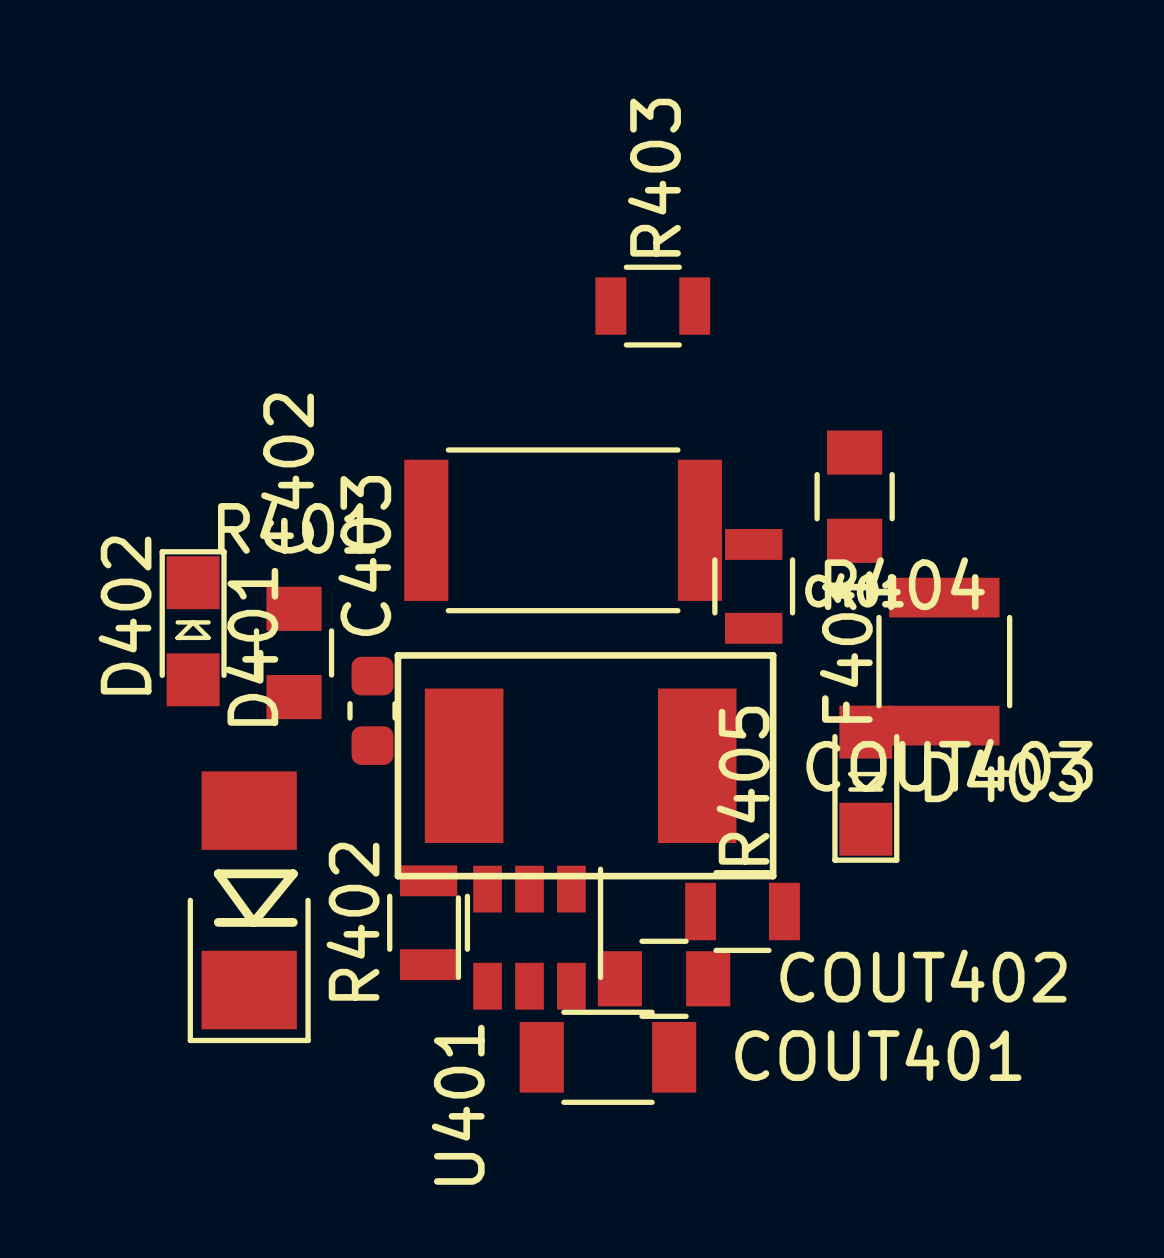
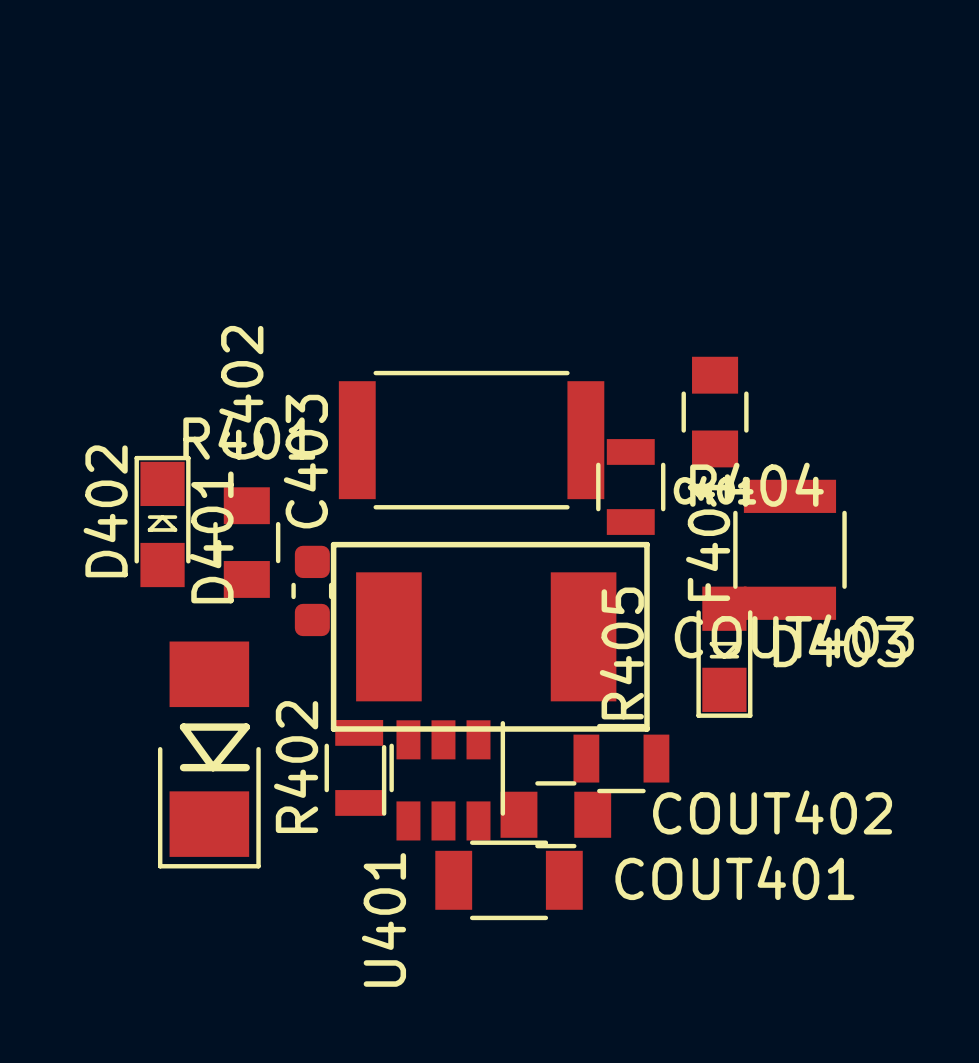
R403: (652, 306) -> none

